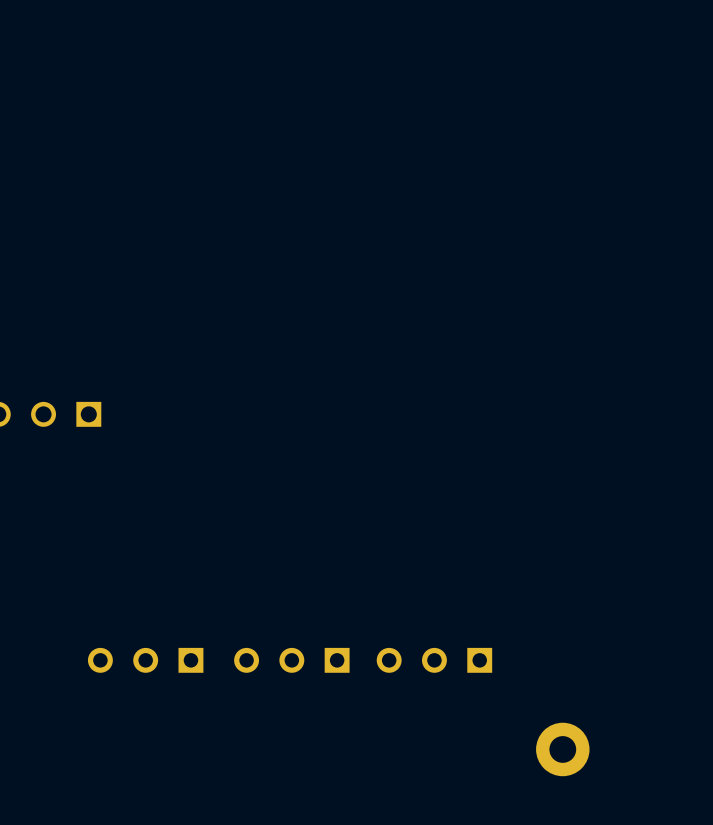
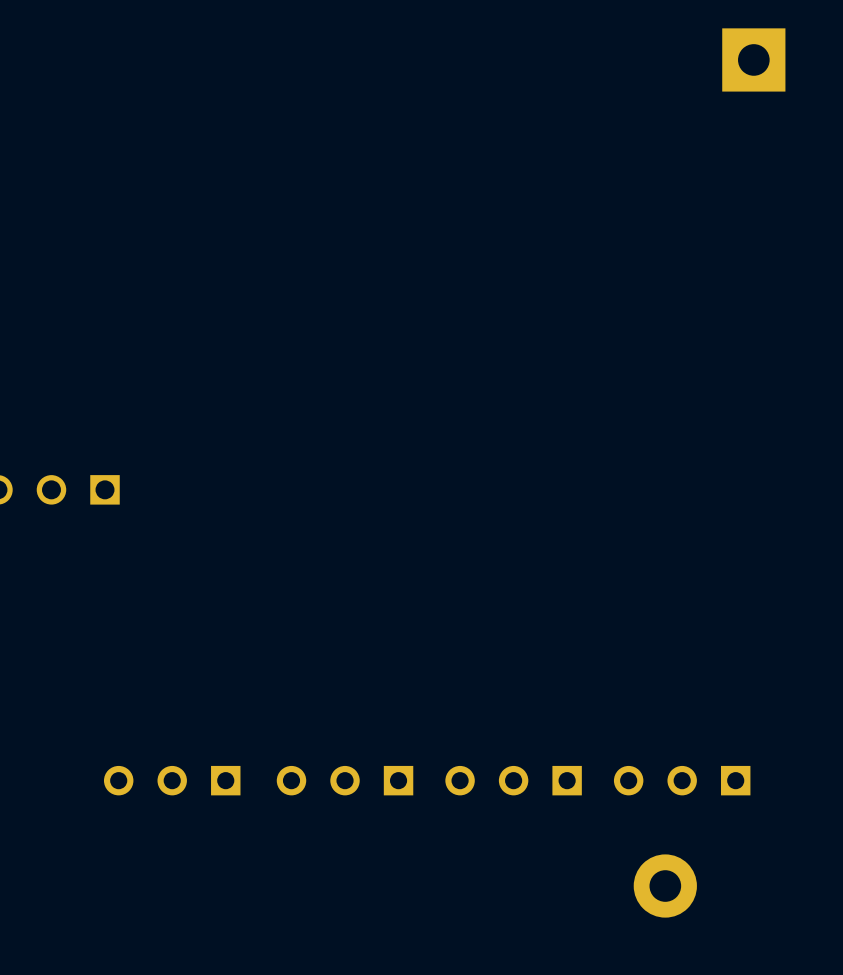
part: none -> (753, 59)
part: none -> (682, 780)

